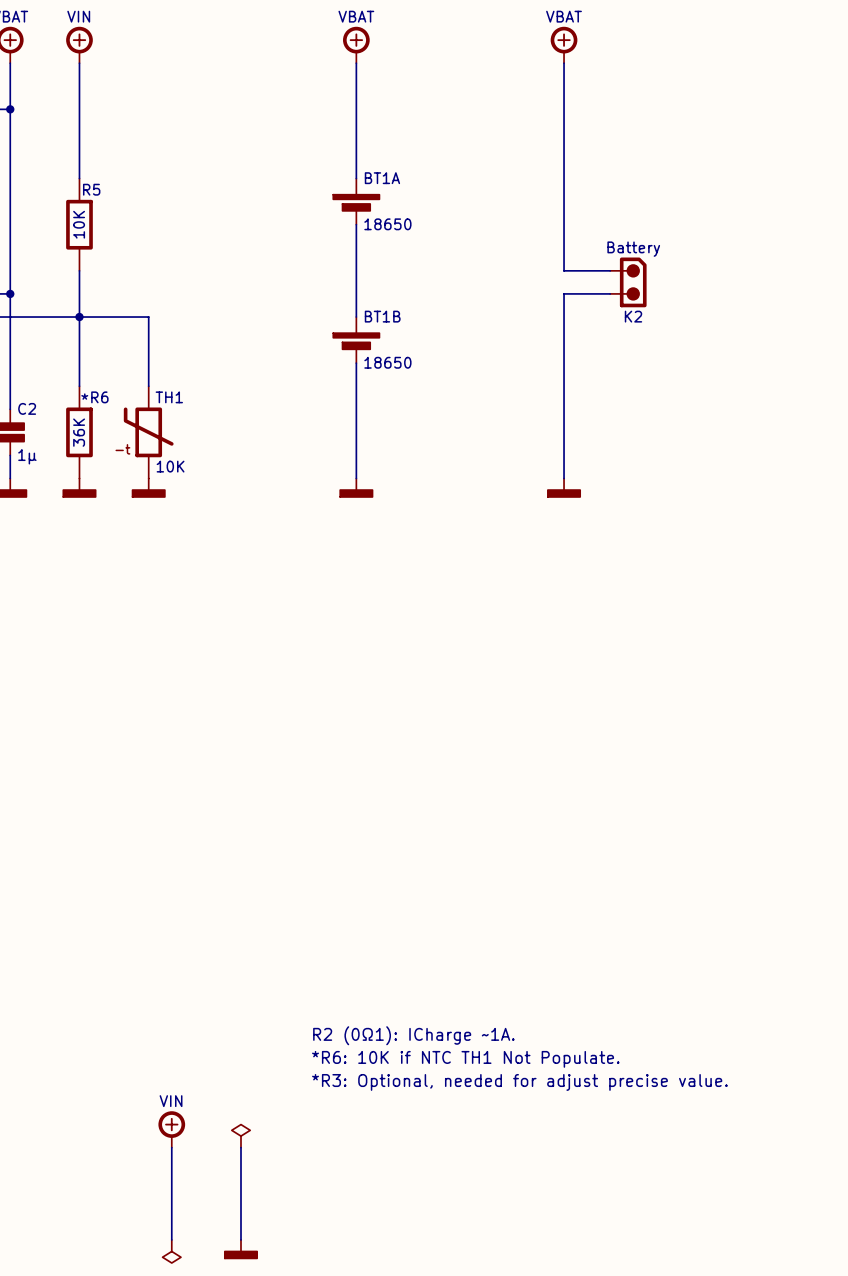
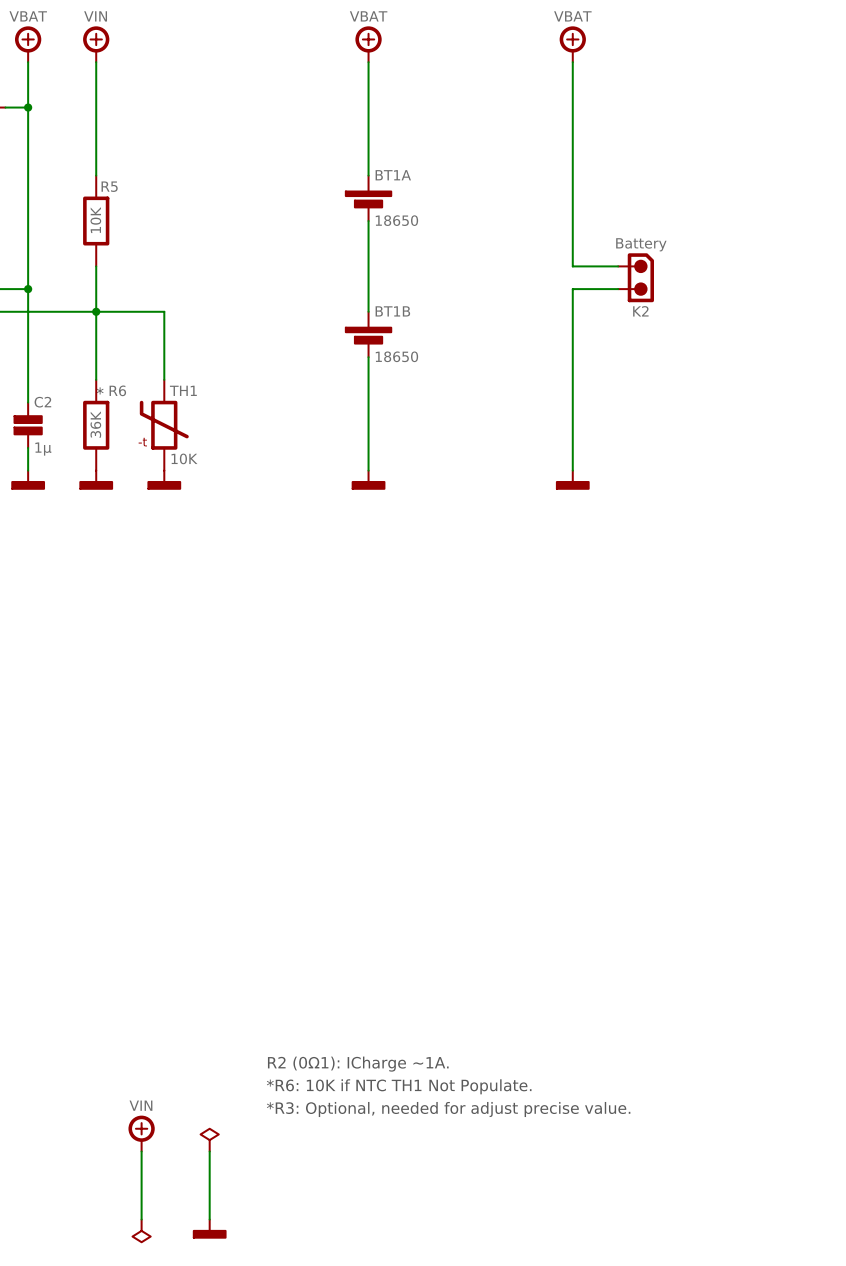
text position: R2 (0Ω1): ICharge ~1A. (413, 1035) -> R2 (0Ω1): ICharge ~1A. (358, 1064)
text position: *R6: 10K if NTC TH1 Not Populate. (465, 1059) -> *R6: 10K if NTC TH1 Not Populate. (399, 1086)
text position: *R3: Optional, needed for adjust precise value. (519, 1082) -> *R3: Optional, needed for adjust precise value. (448, 1109)
power symbol position: (171, 1129) -> (141, 1133)
power symbol: (240, 1136) -> none
wire: (171, 1147) (171, 1239) -> none
wire: (240, 1147) (240, 1239) -> none
power symbol: none -> (209, 1140)
wire: none -> (141, 1151) (141, 1219)
wire: none -> (209, 1151) (209, 1219)
power symbol position: (240, 1249) -> (209, 1228)
power symbol position: (171, 1251) -> (141, 1230)

